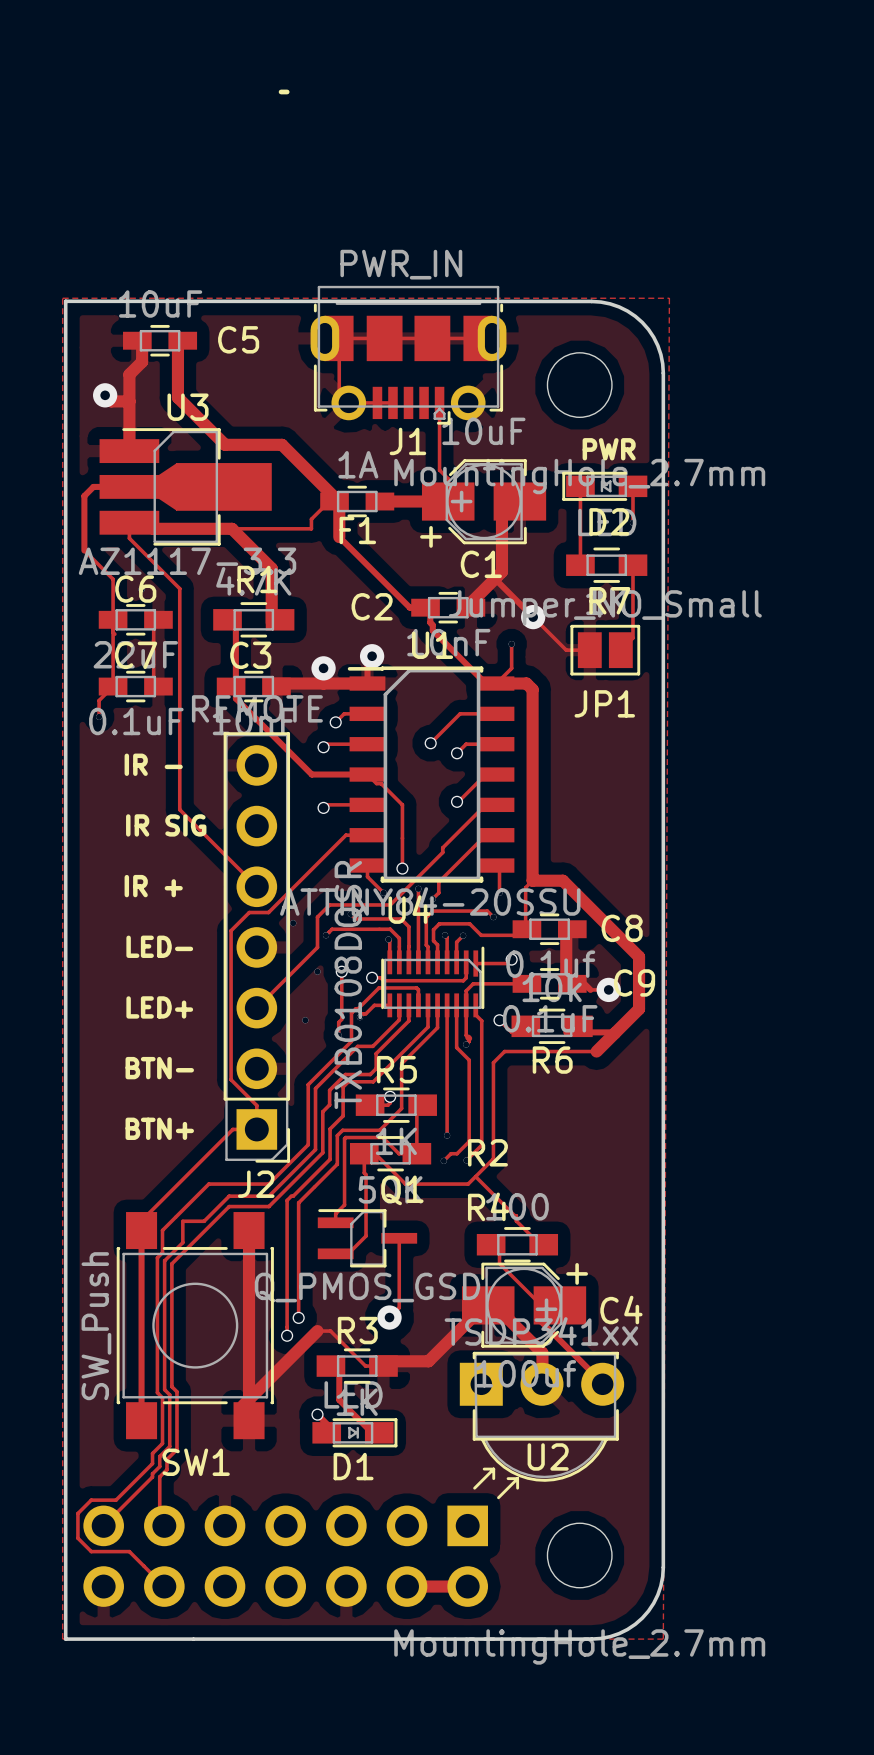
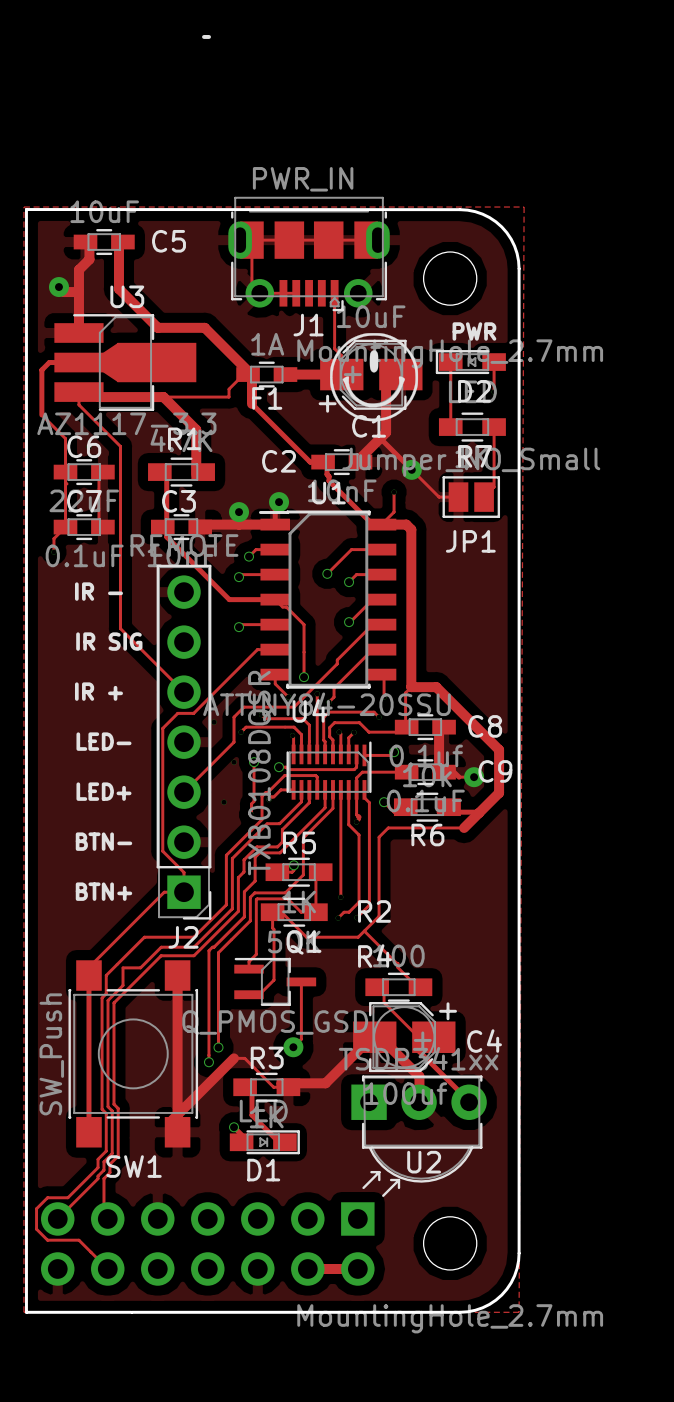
drawing: none -> [330, 333, 419, 422]

